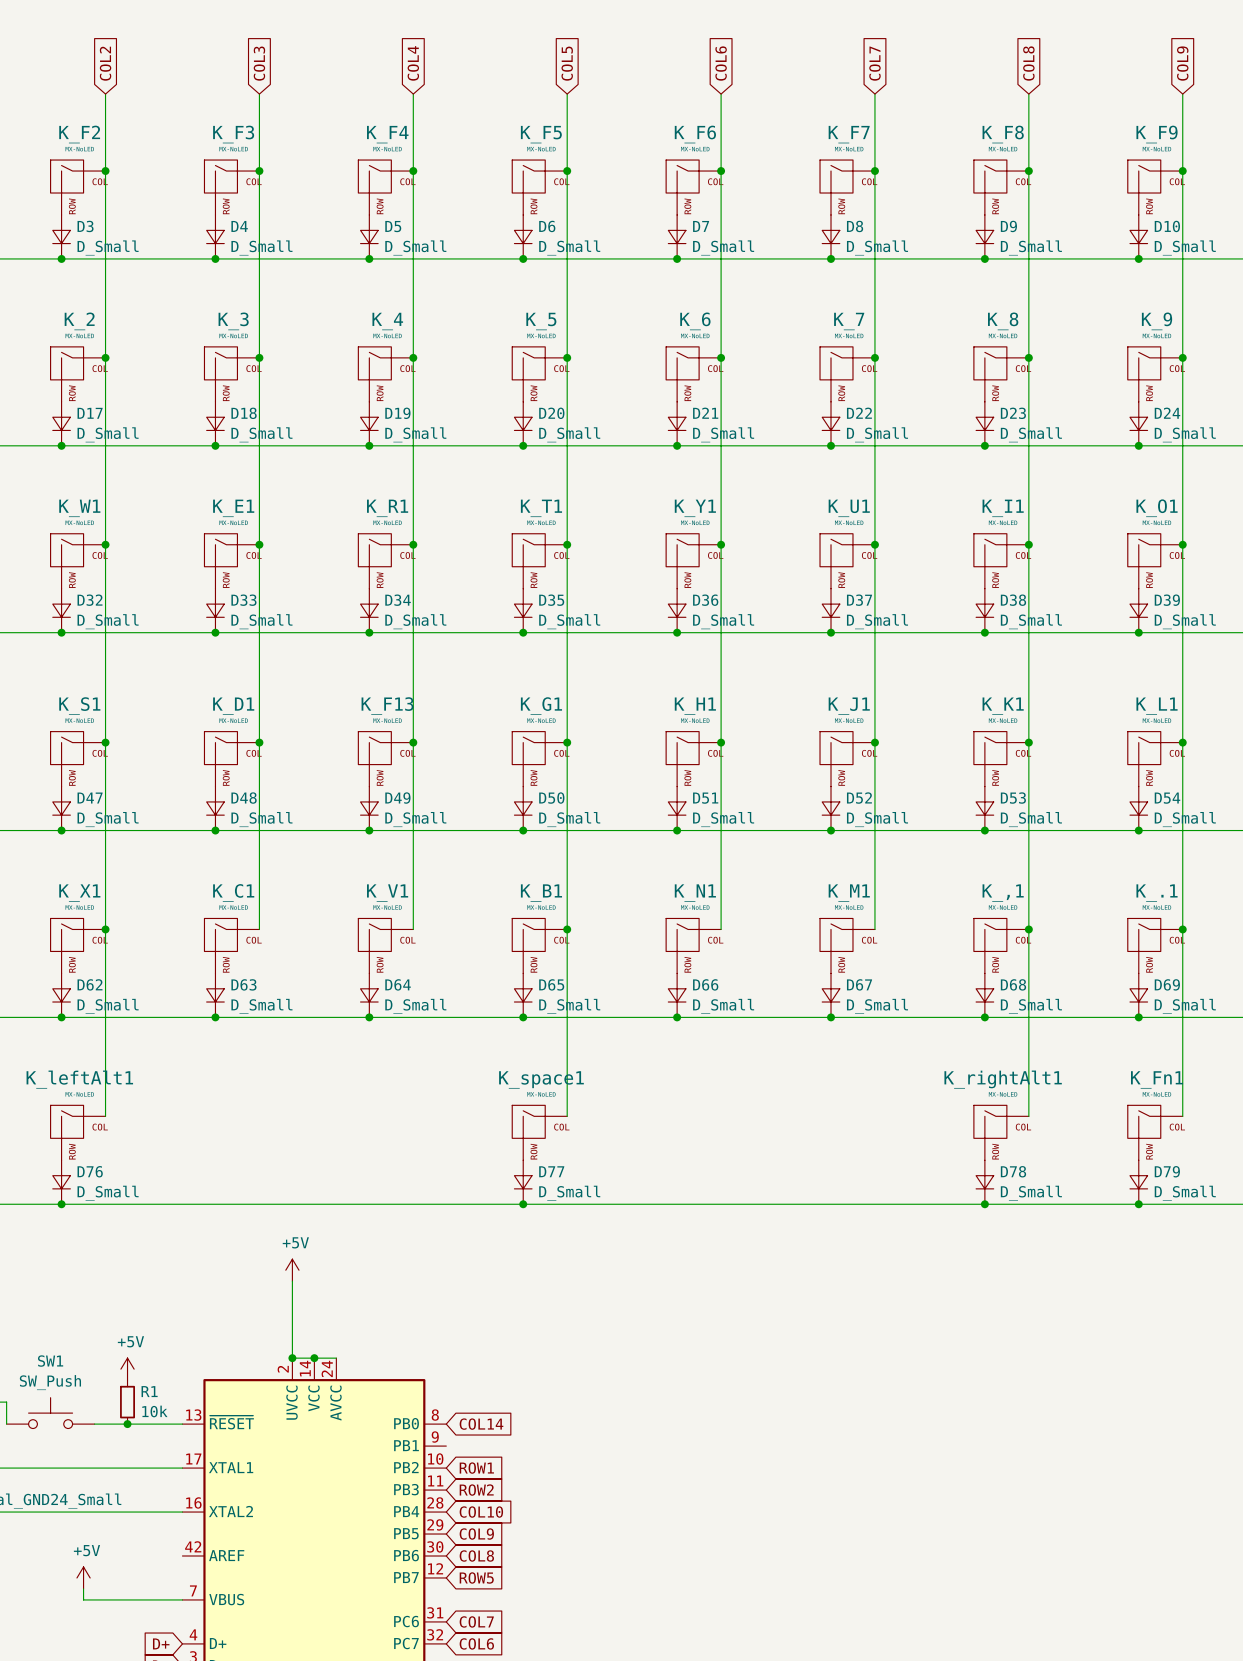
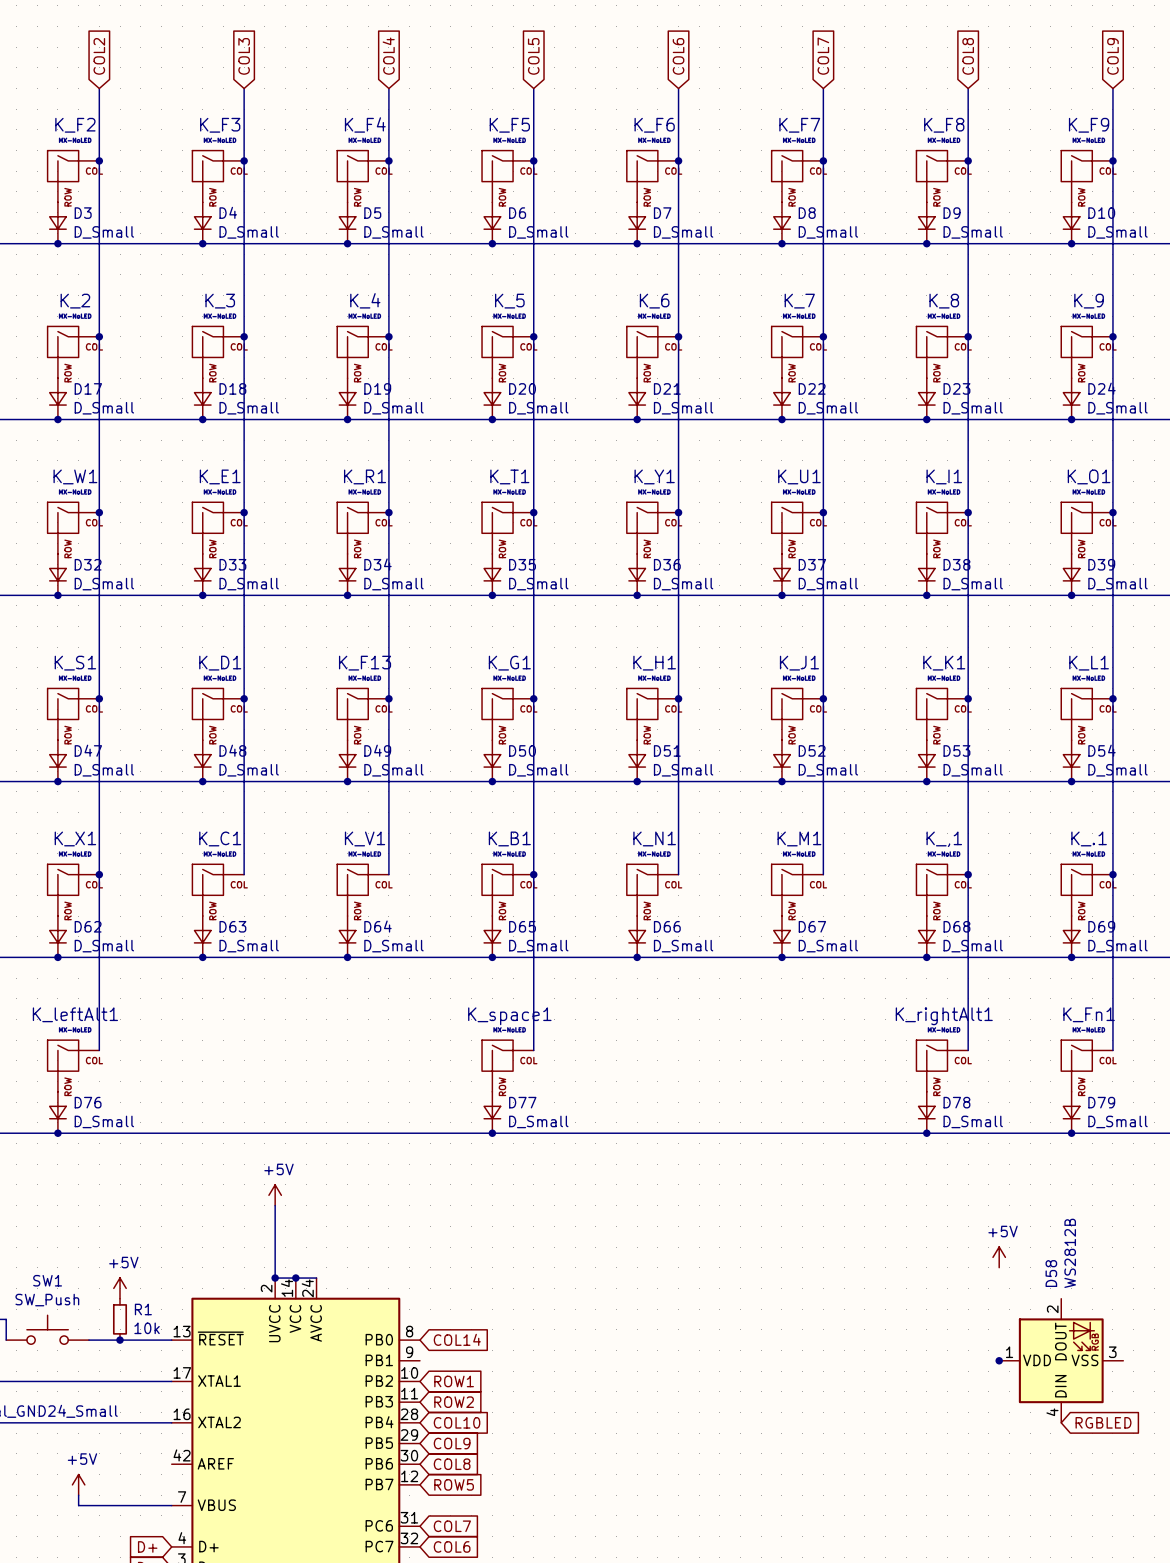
power symbol: none -> +5V (999, 1257)
junction: none -> (999, 1360)
D58: none -> WS2812B (1061, 1360)
global label: none -> RGBLED (1103, 1422)

